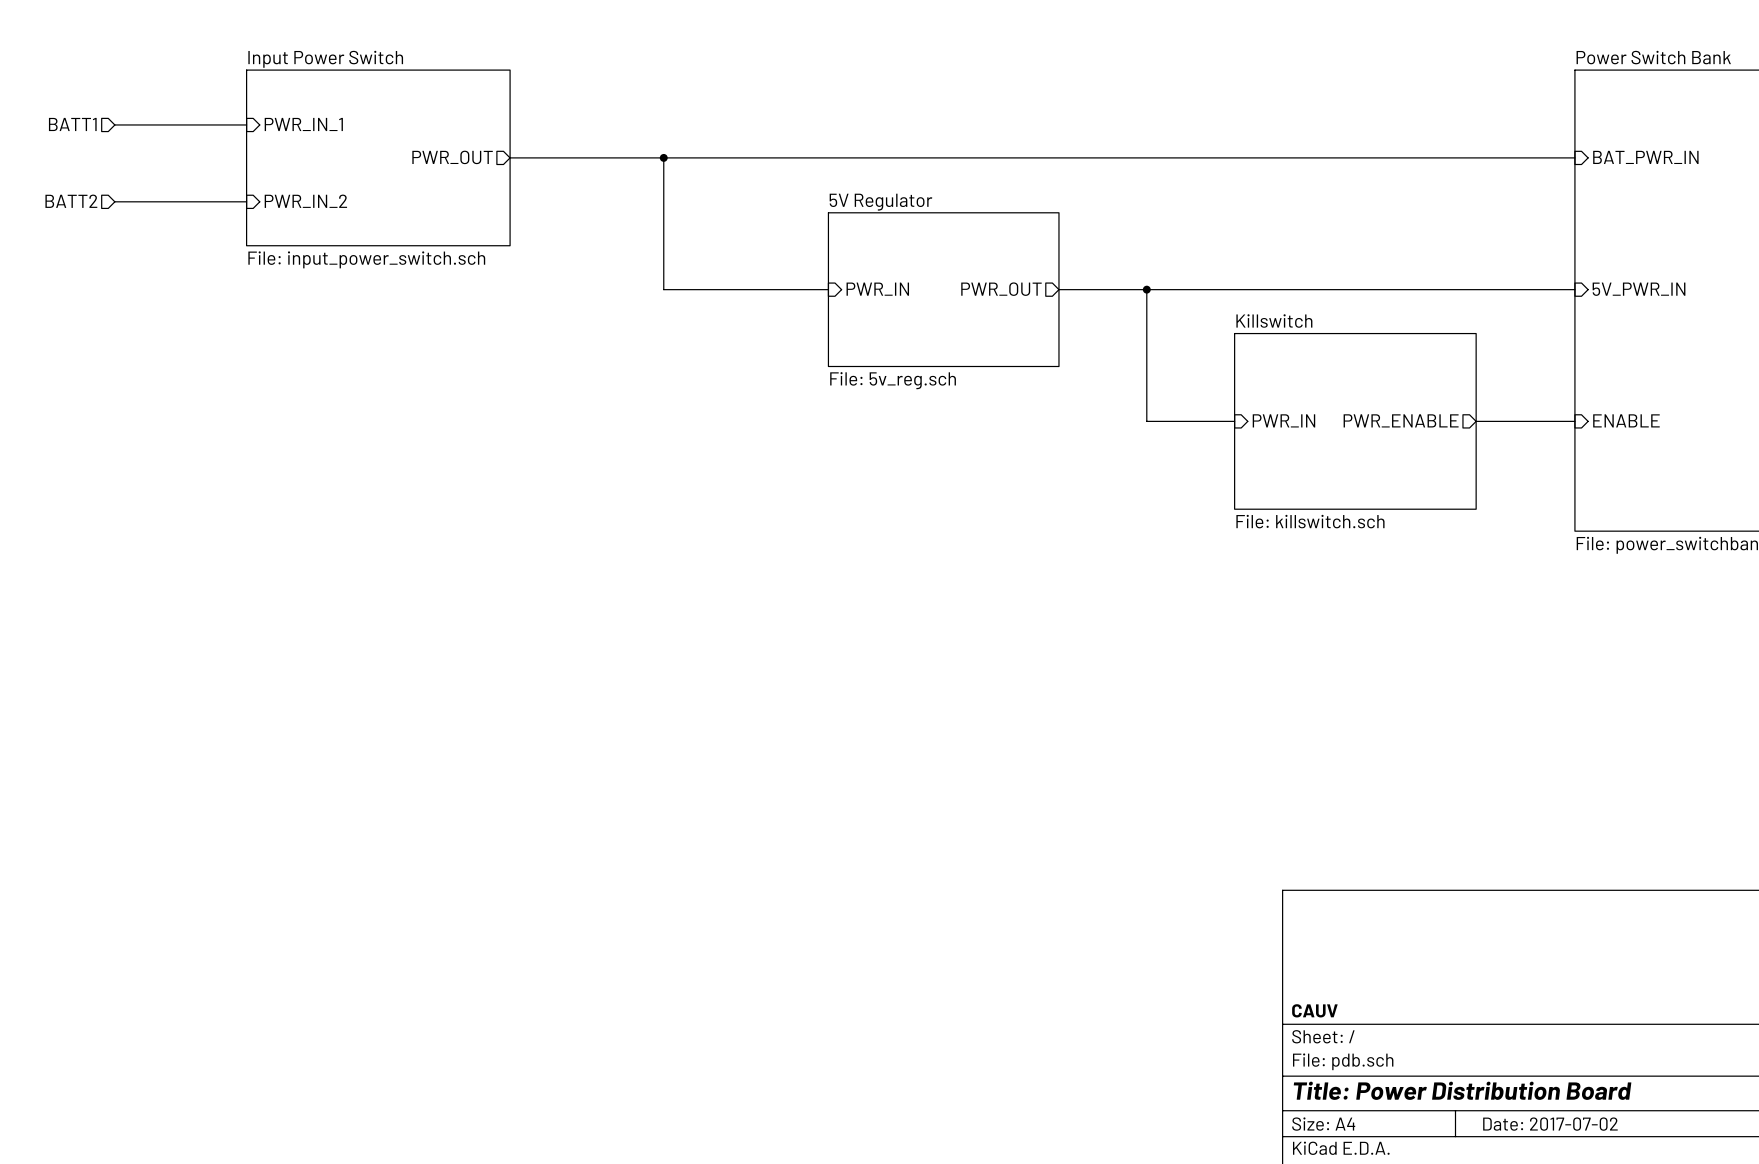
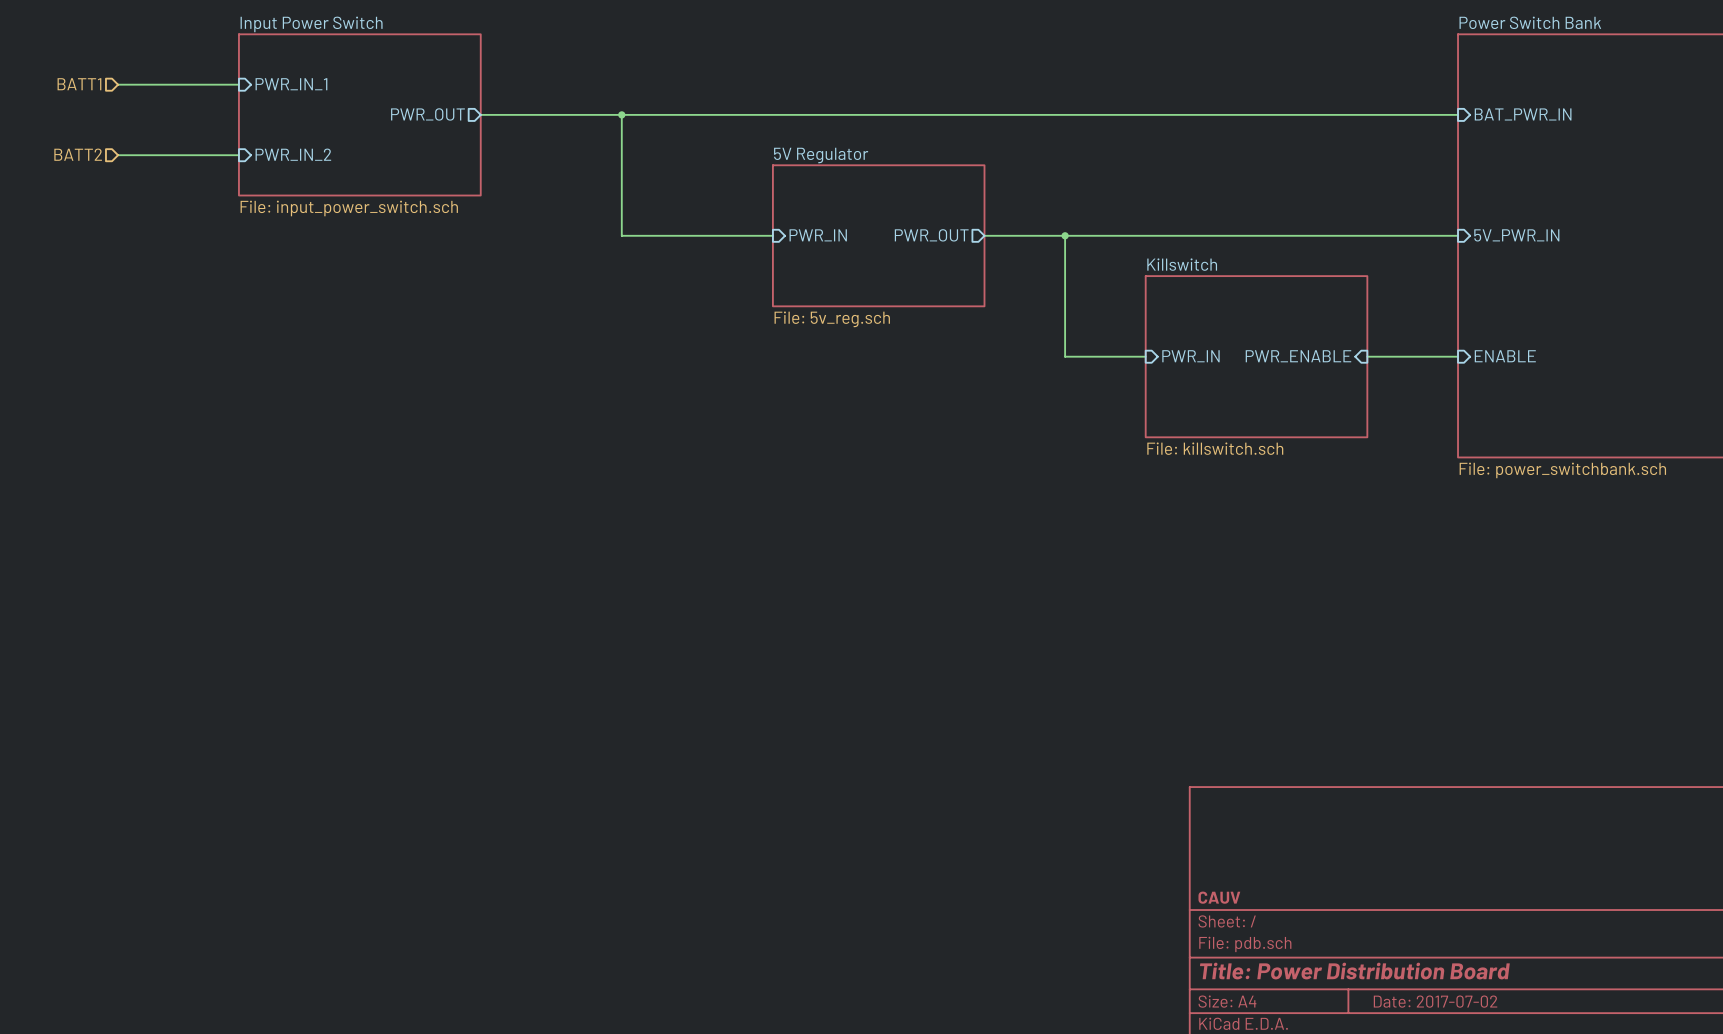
sheet pin shape: output (1401, 420) -> input (1298, 356)

